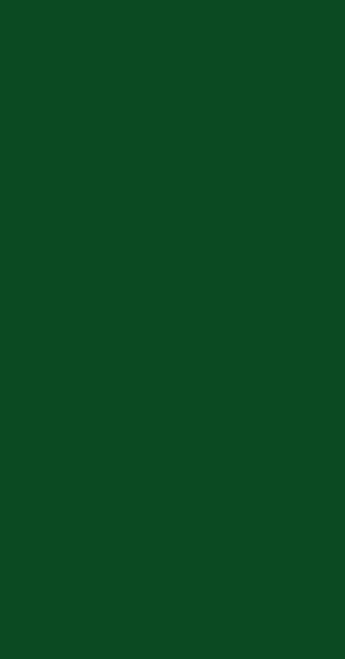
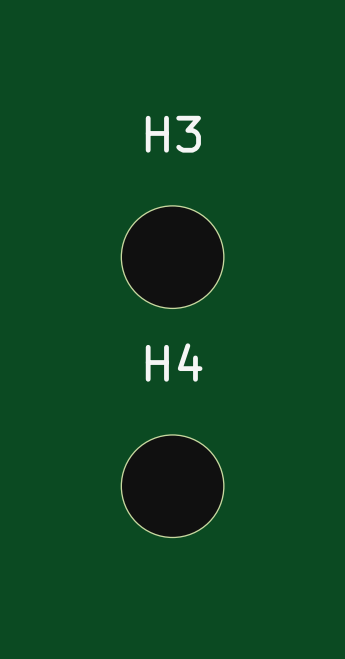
H3: none -> (172, 257)
H4: none -> (172, 486)

